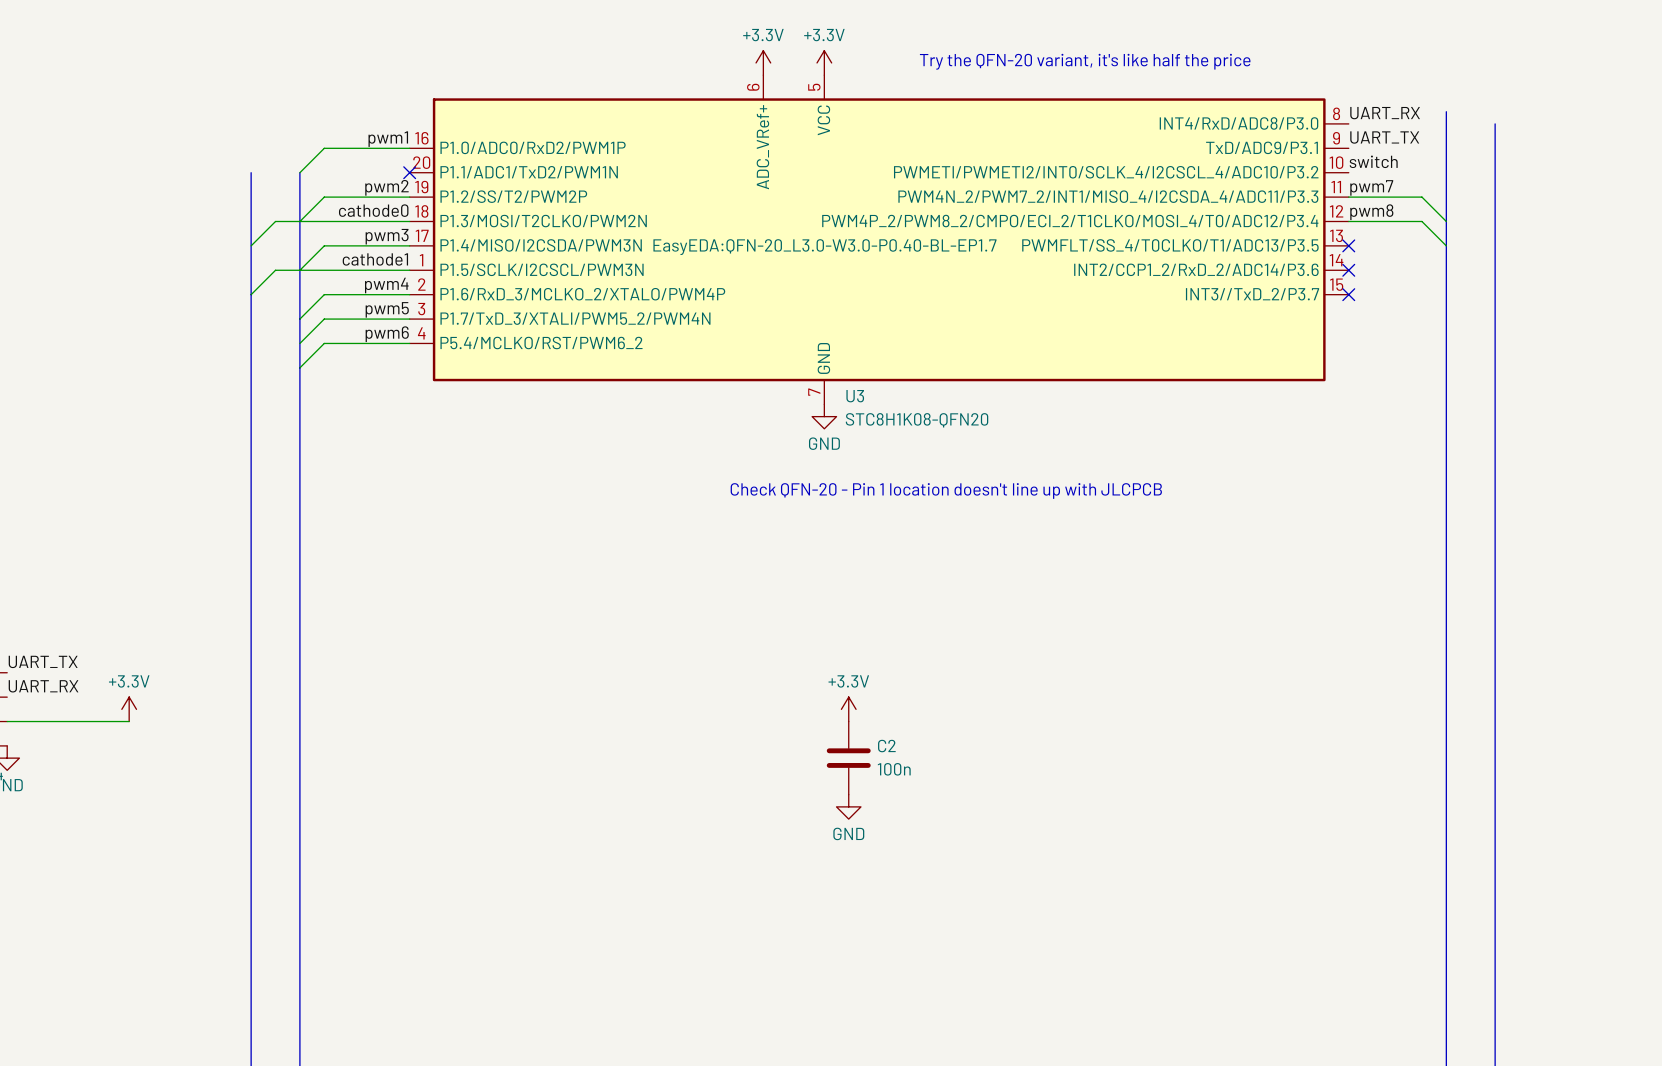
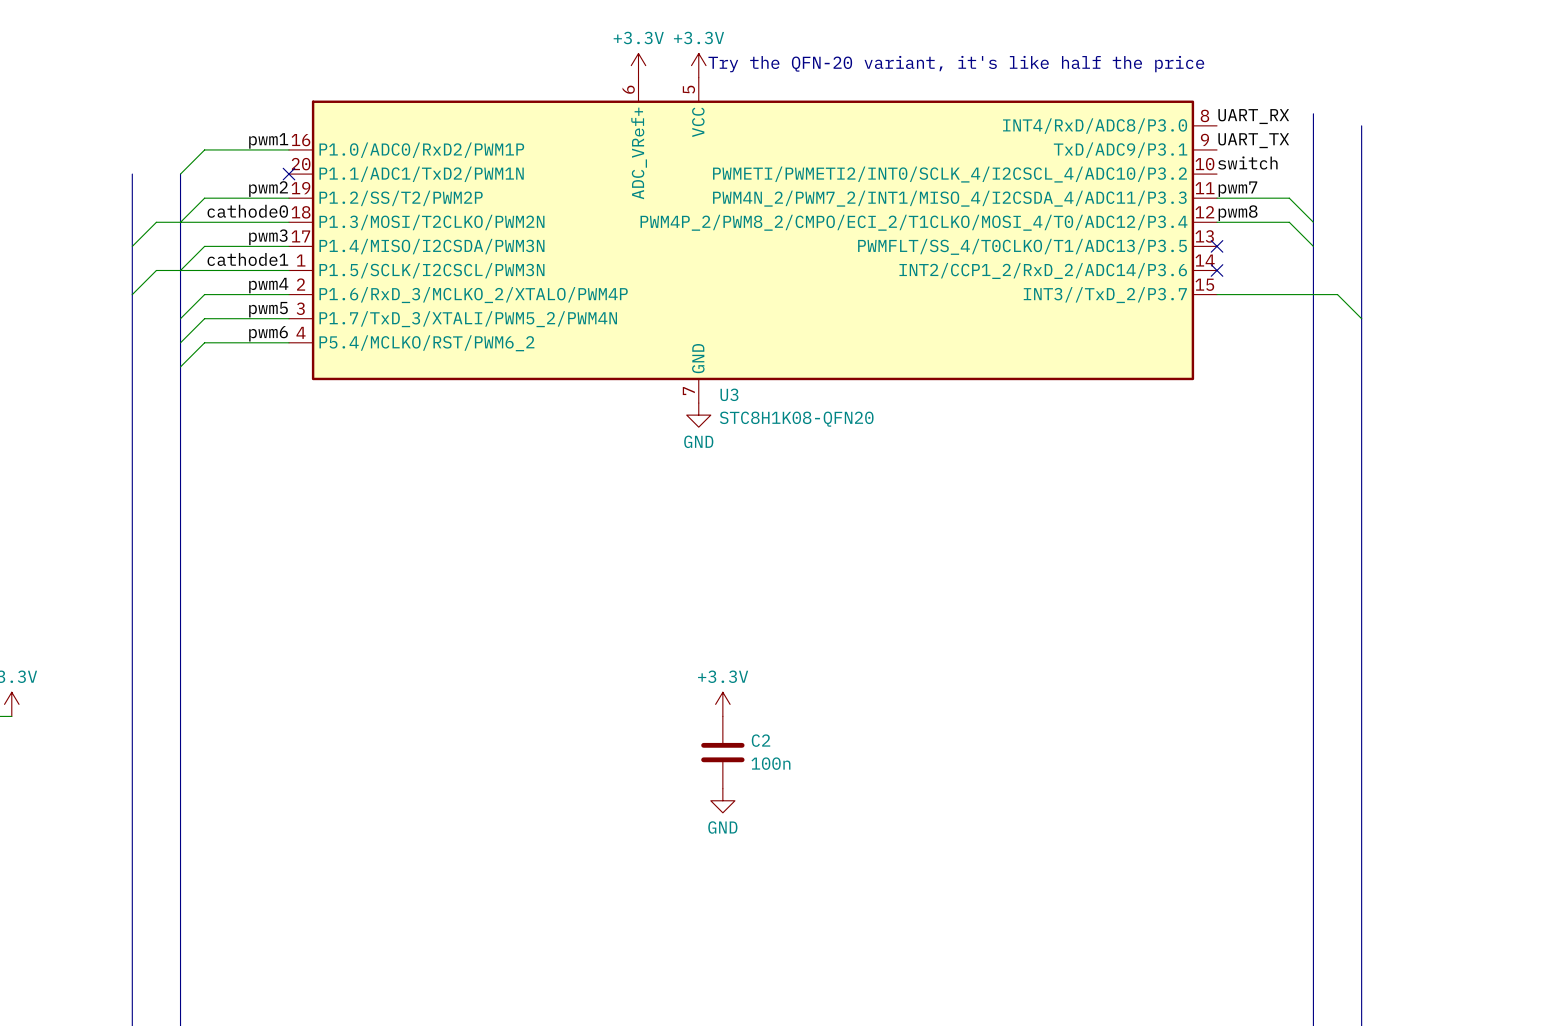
U3 text: EasyEDA:QFN-20_L3.0-W3.0-P0.40-BL-EP1.7 (824, 247) -> none
wire: none -> (1217, 294) (1337, 294) (1361, 318)
no-connect mark: (1348, 294) -> none
text: Check QFN-20 - Pin 1 location doesn't line up with JLCPCB (946, 490) -> none

